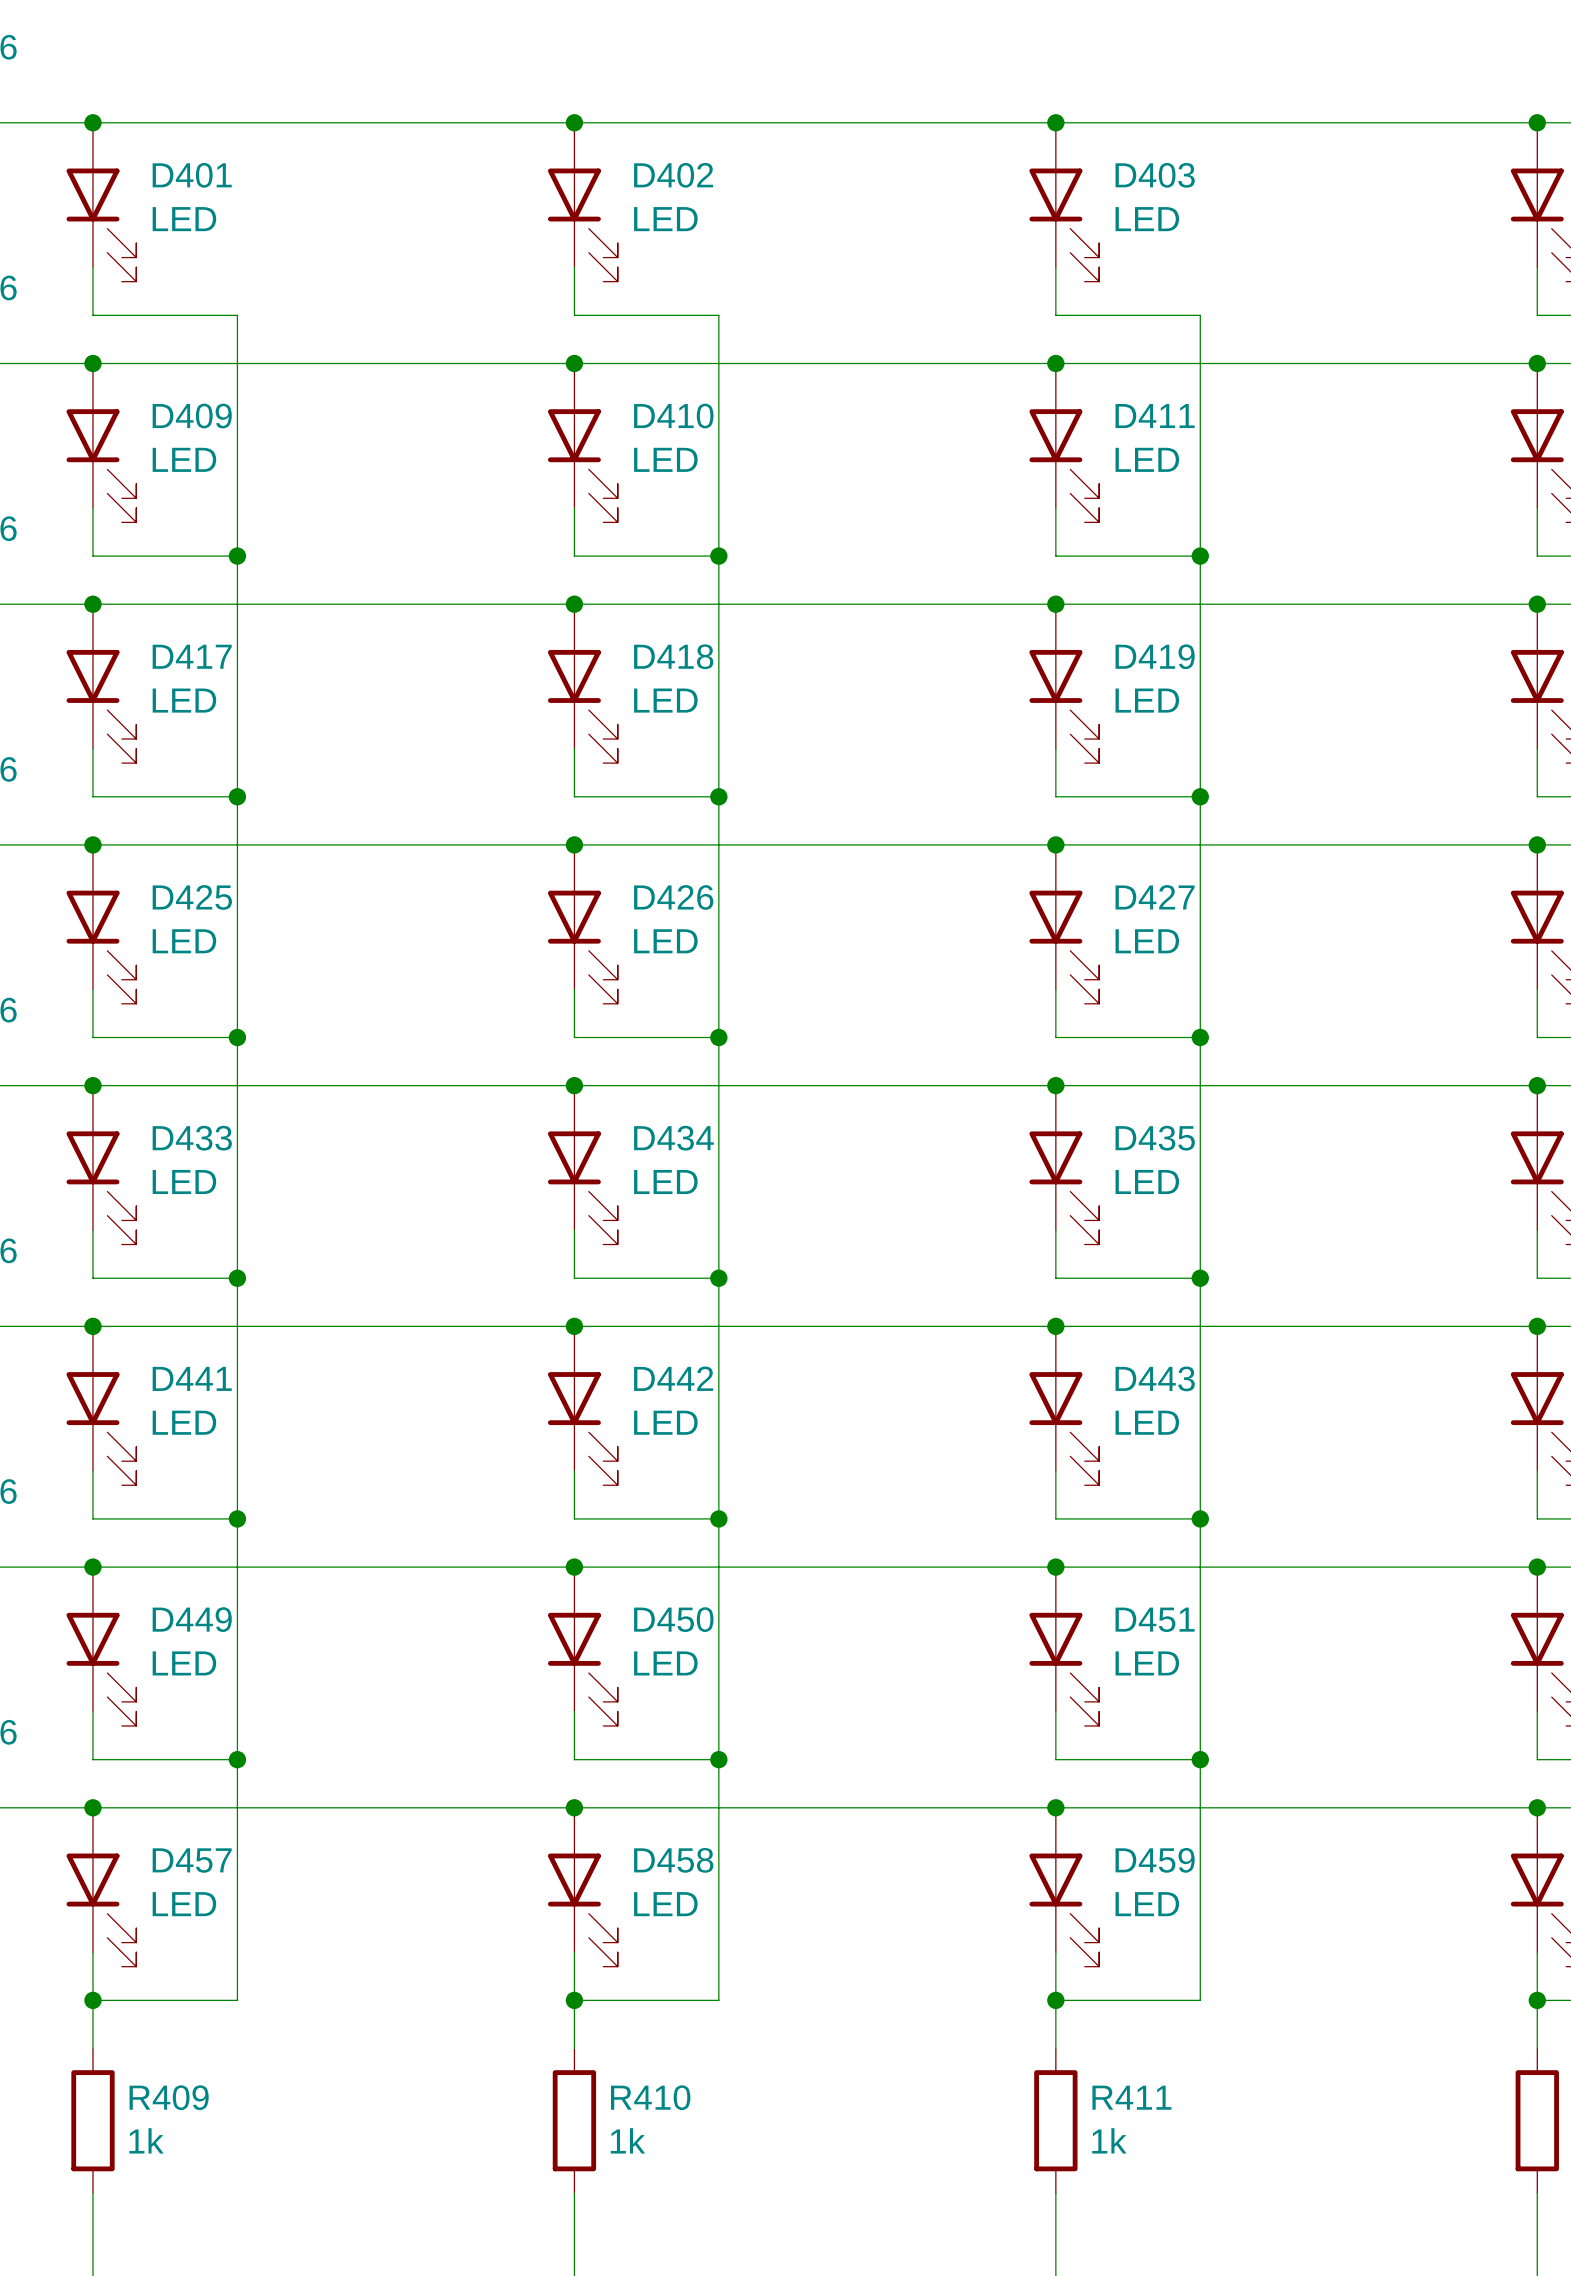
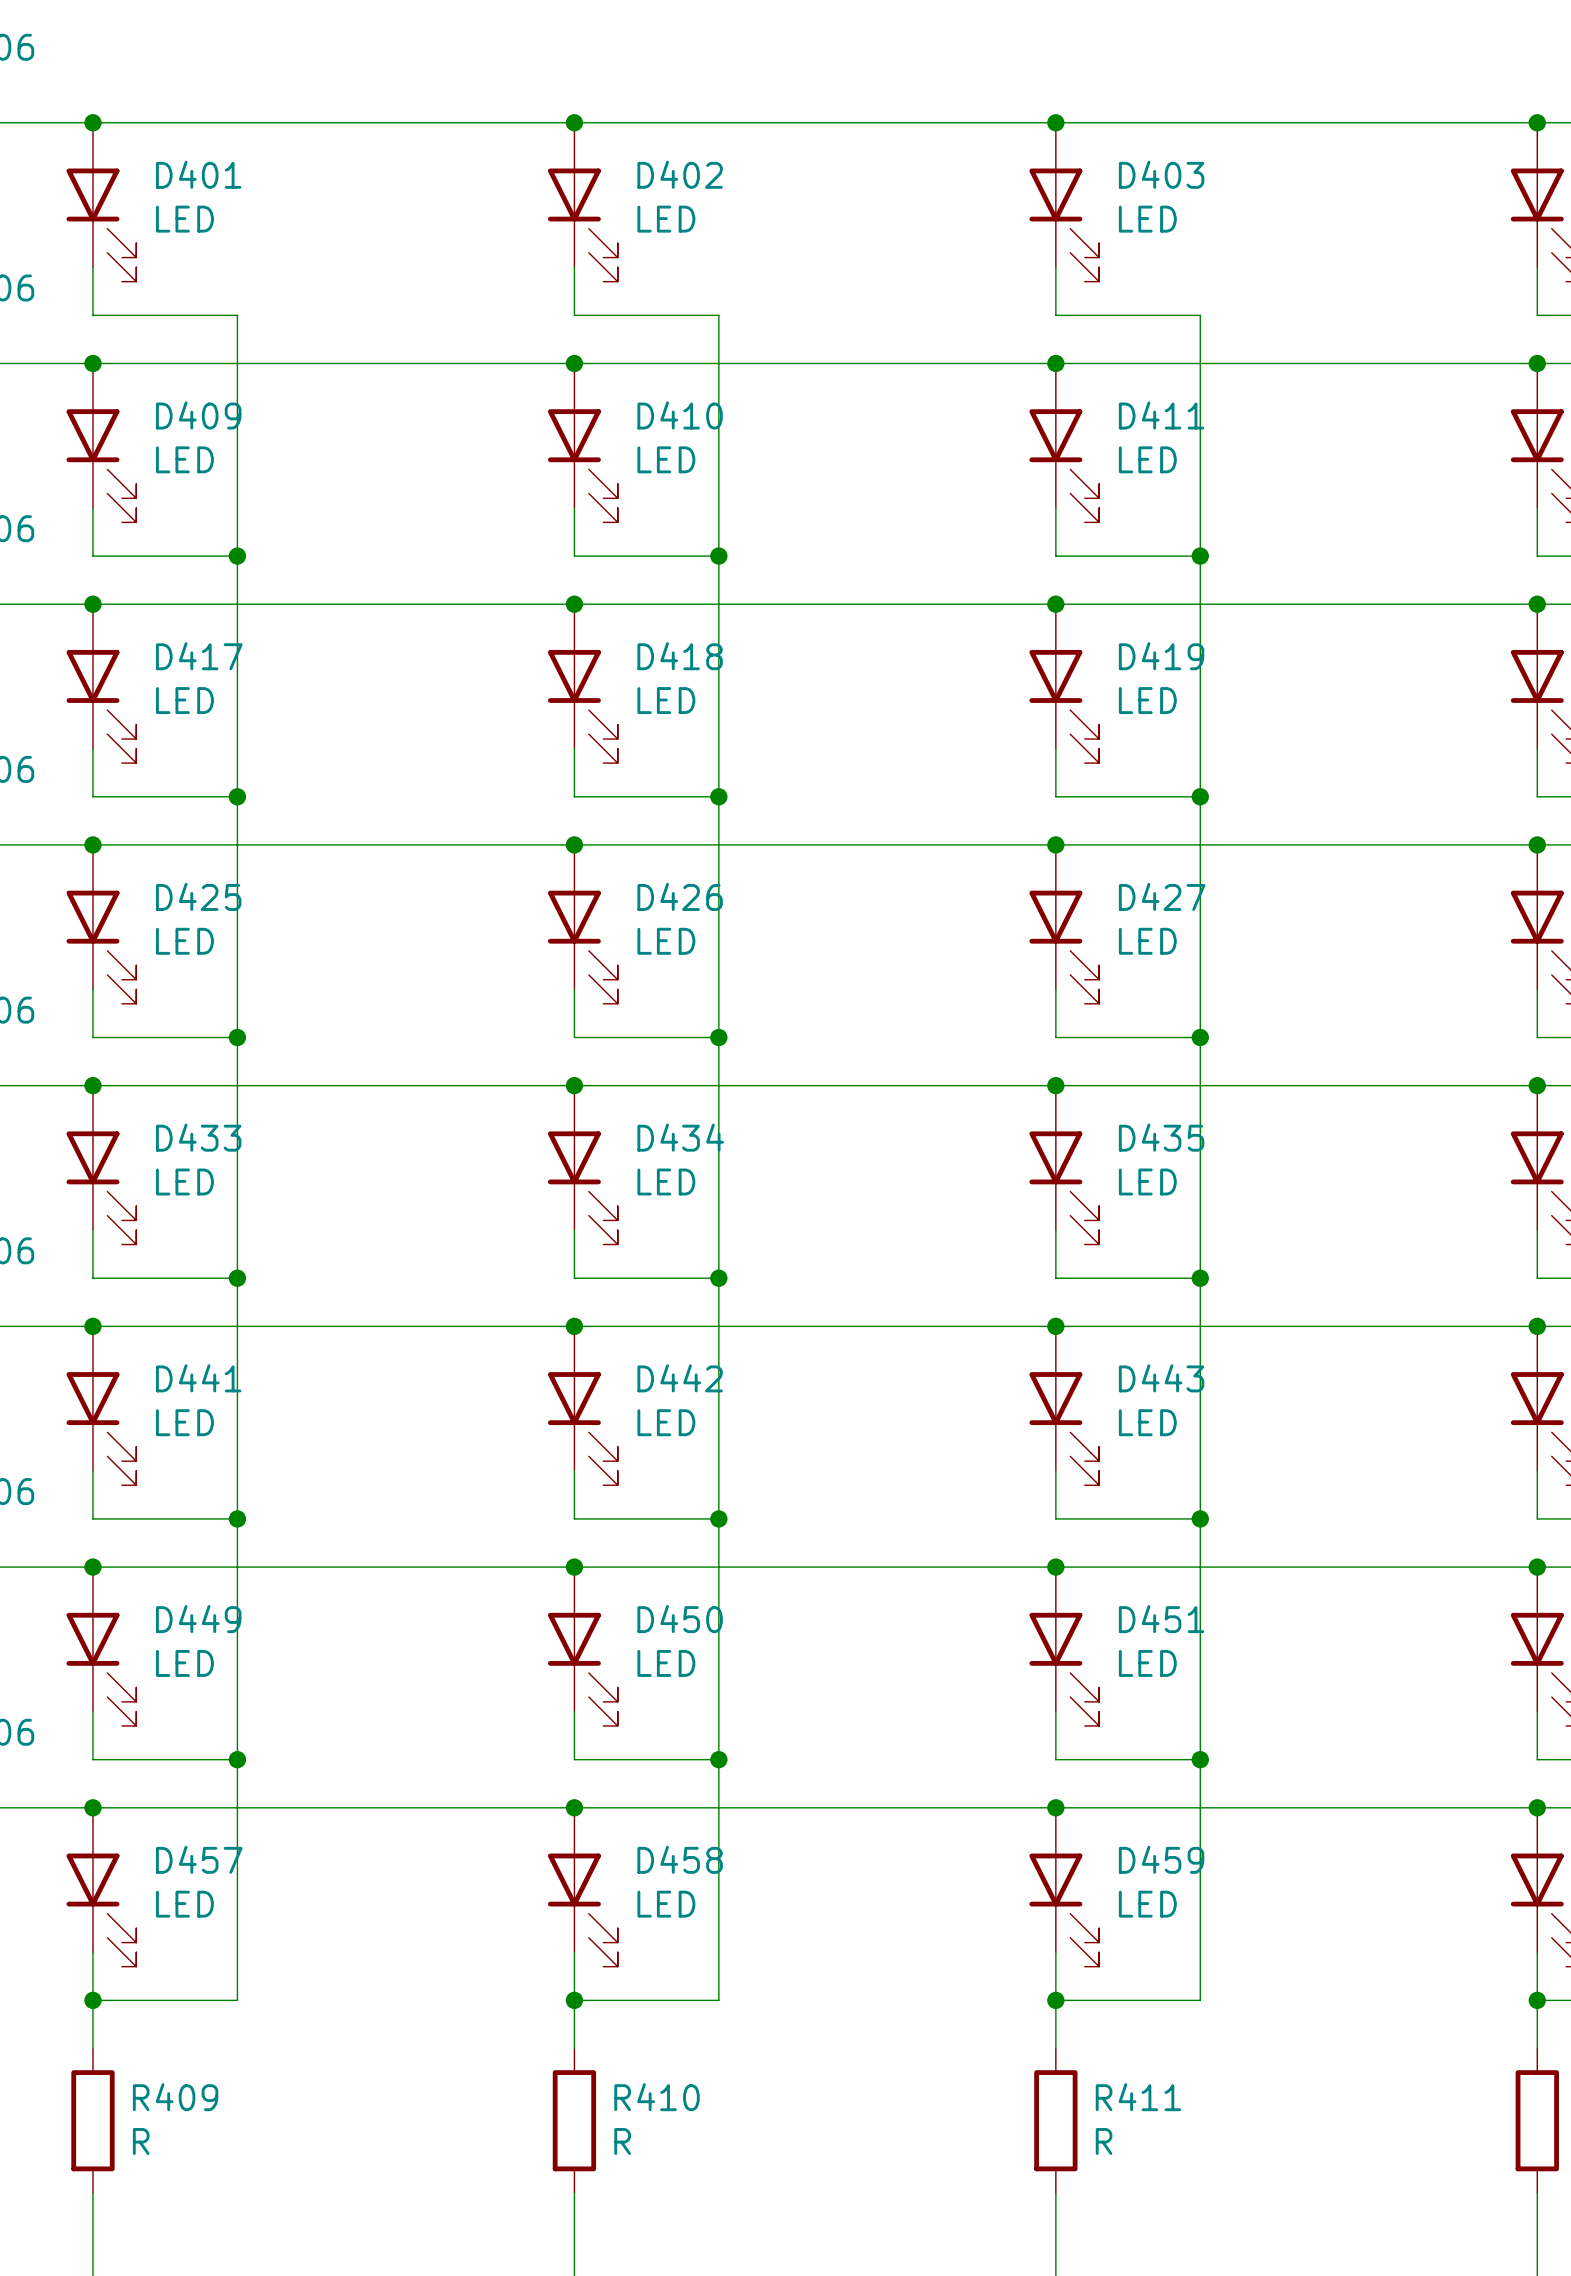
R409 value: 1k (146, 2140) -> R (141, 2141)
R410 value: 1k (627, 2140) -> R (622, 2141)
R411 value: 1k (1109, 2140) -> R (1104, 2141)

